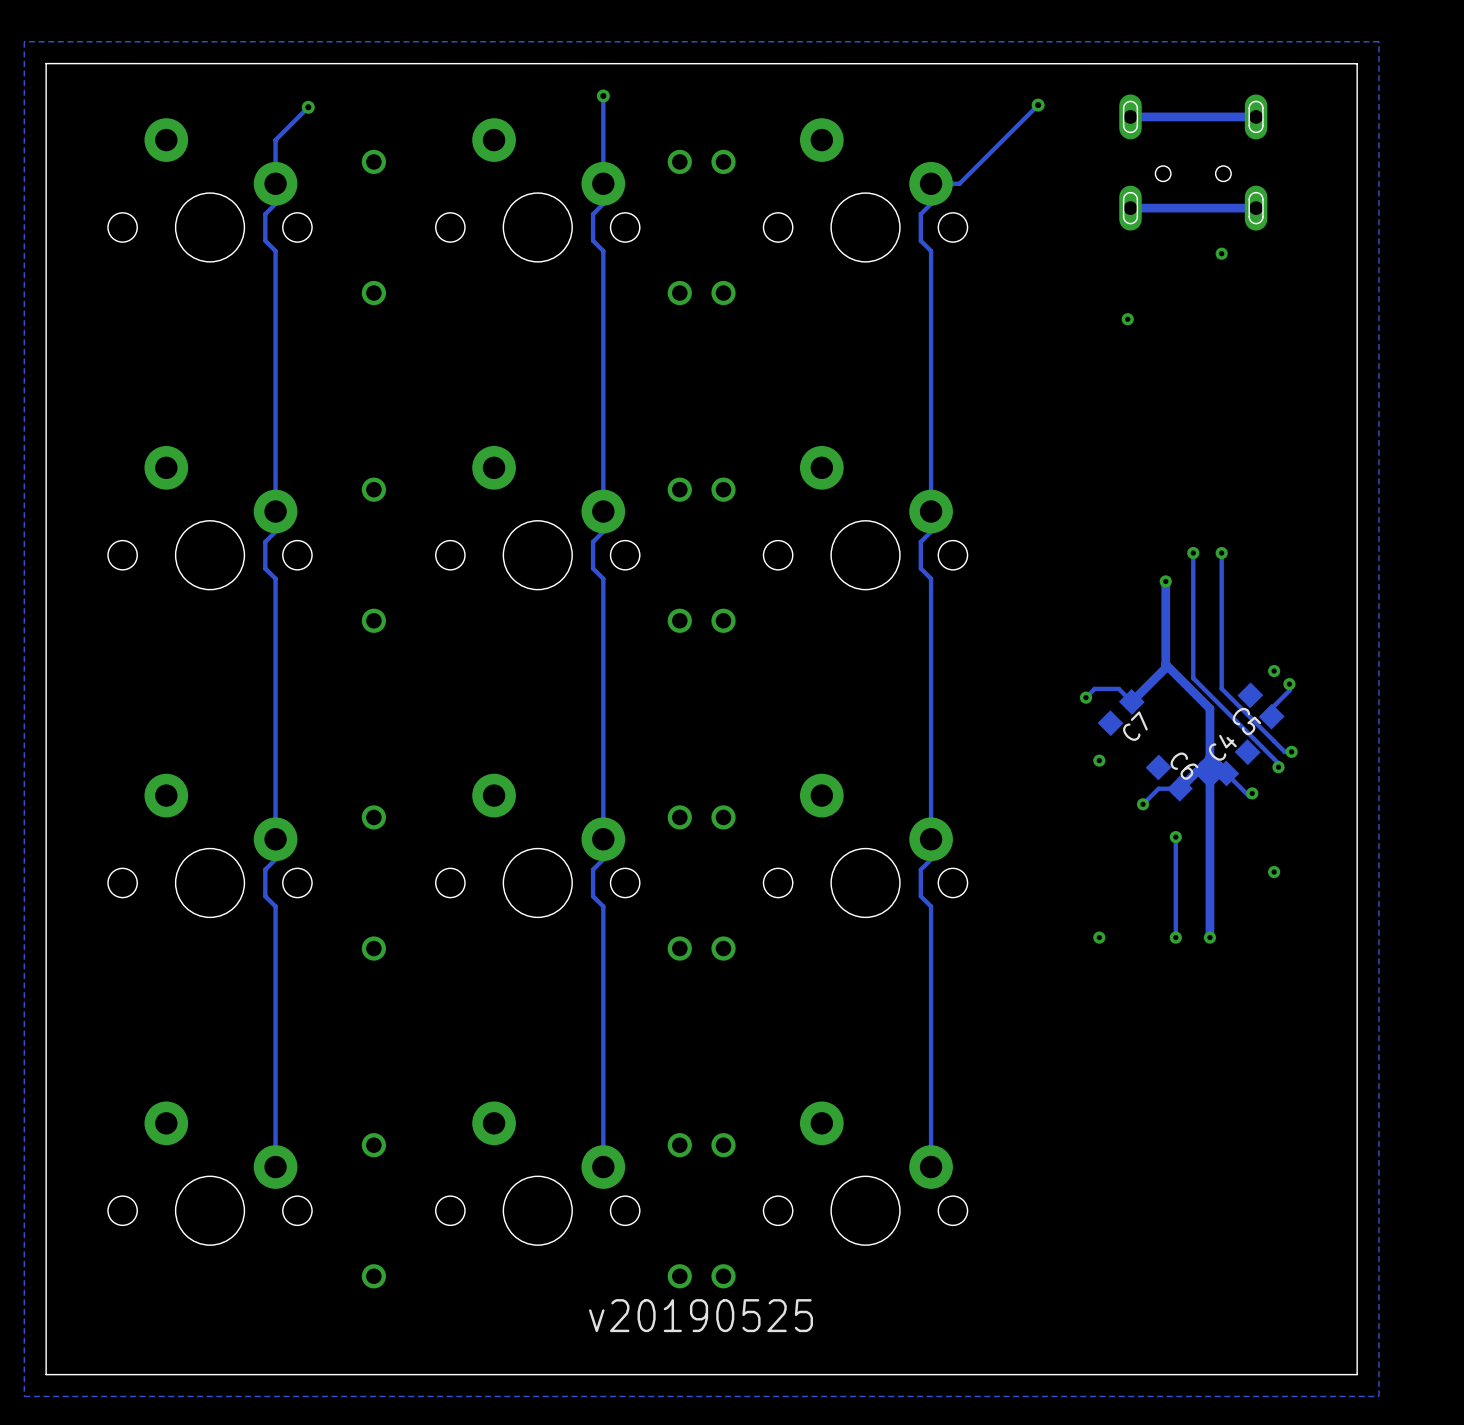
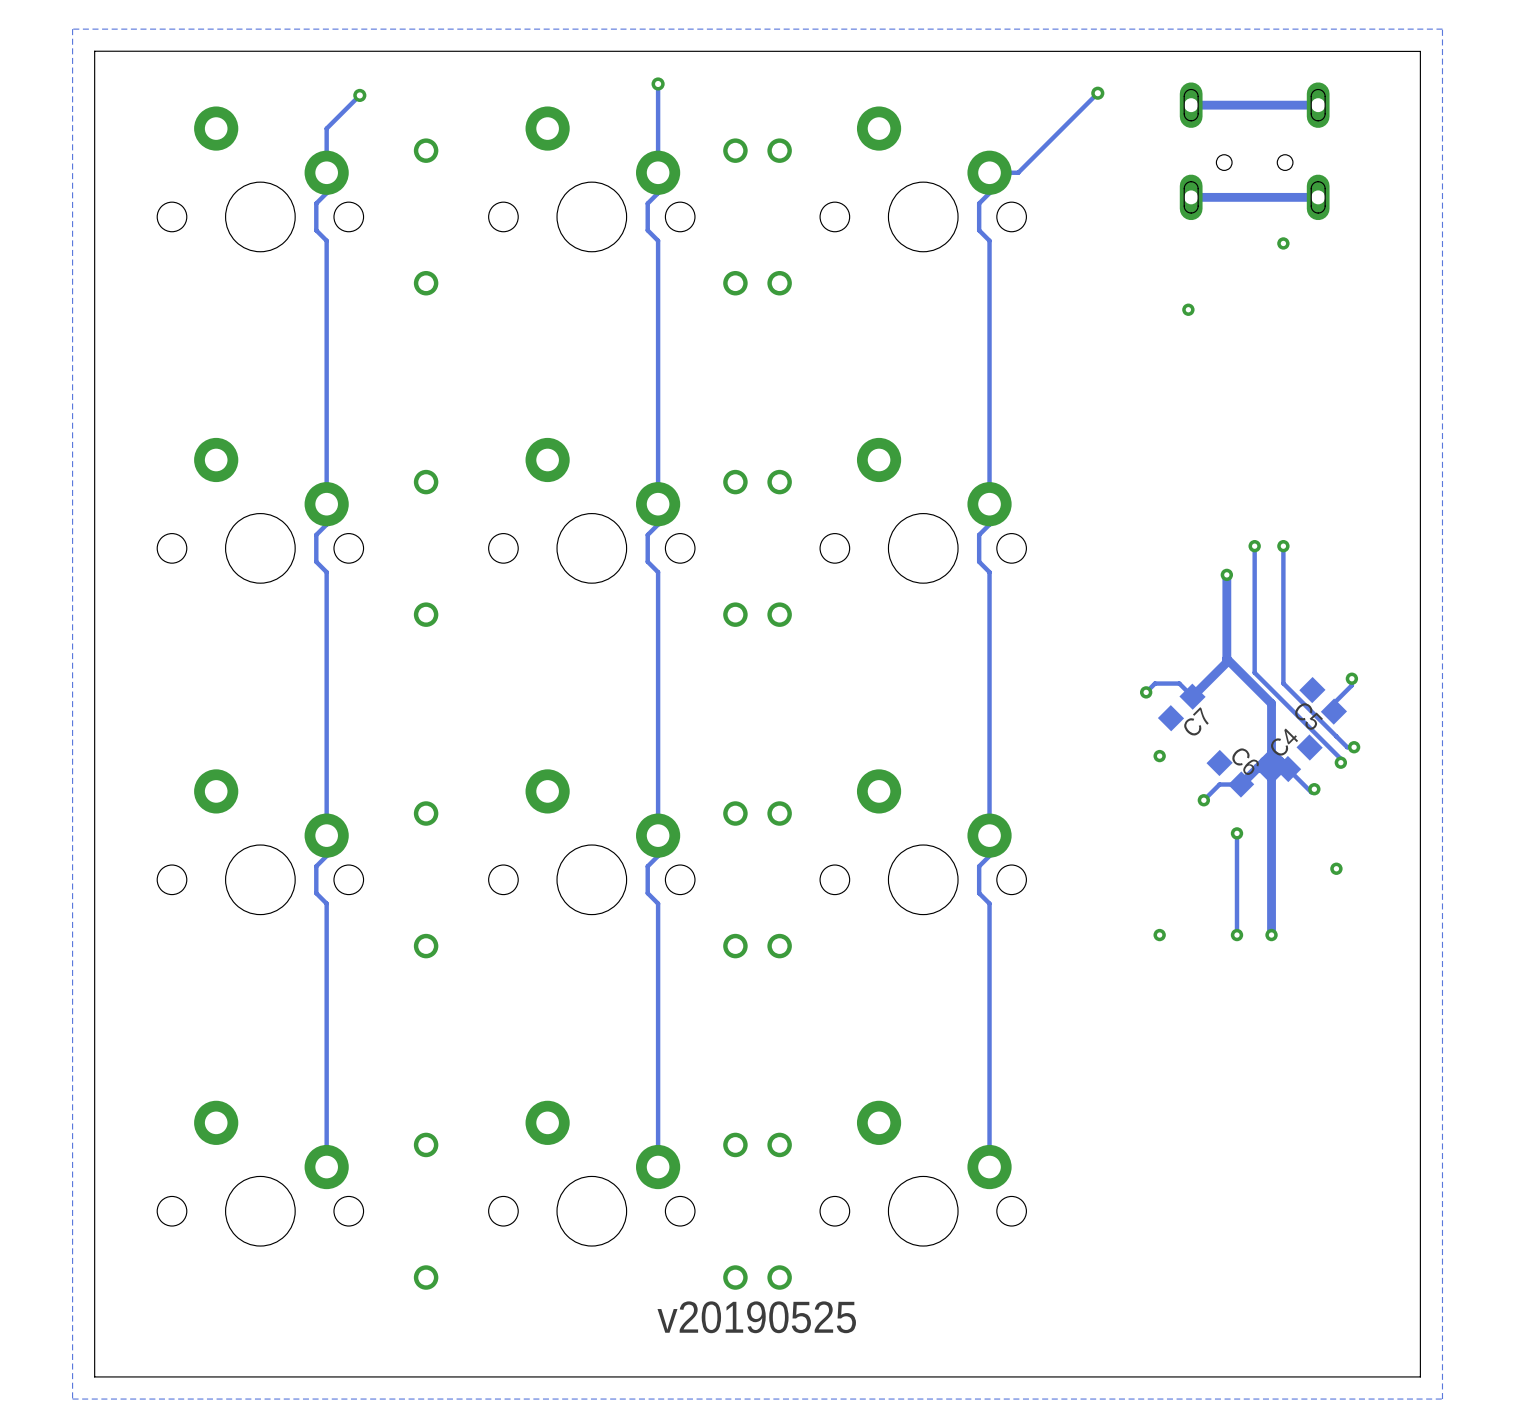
via: (1274, 671) -> none

